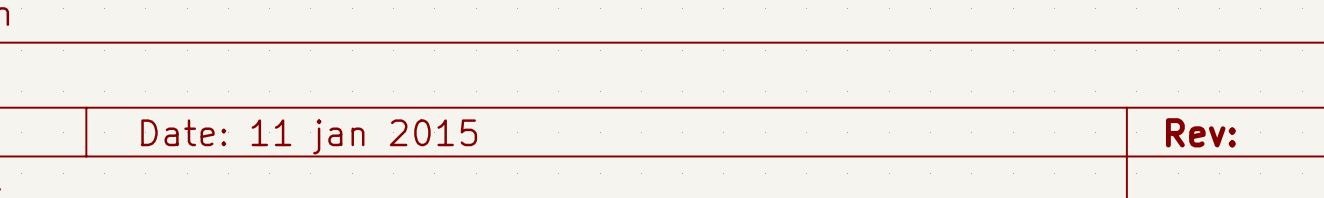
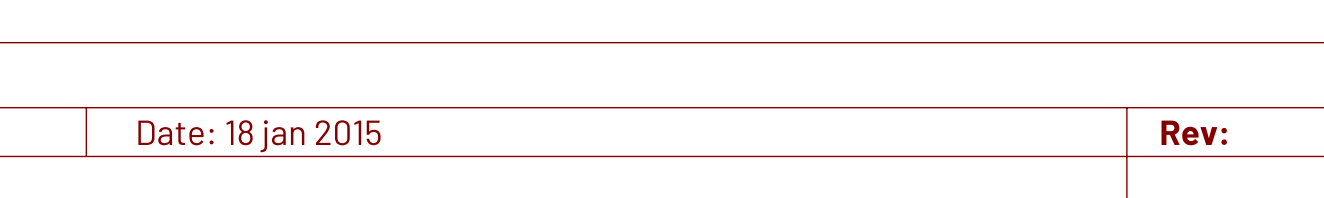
title block: Date: 11 jan 2015 (309, 136) -> Date: 18 jan 2015 (259, 136)

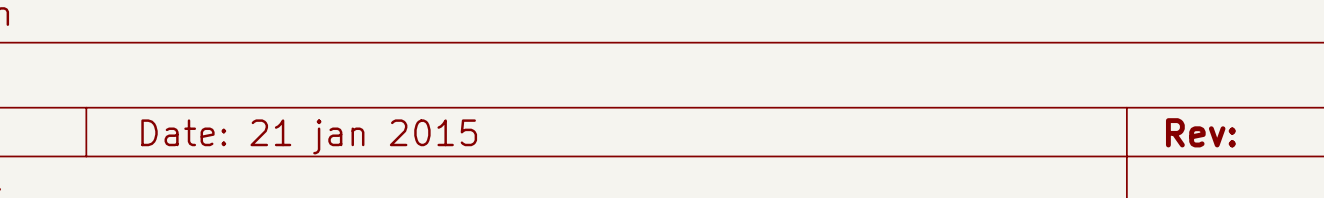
title block: Date: 18 jan 2015 (259, 136) -> Date: 21 jan 2015 (309, 136)

